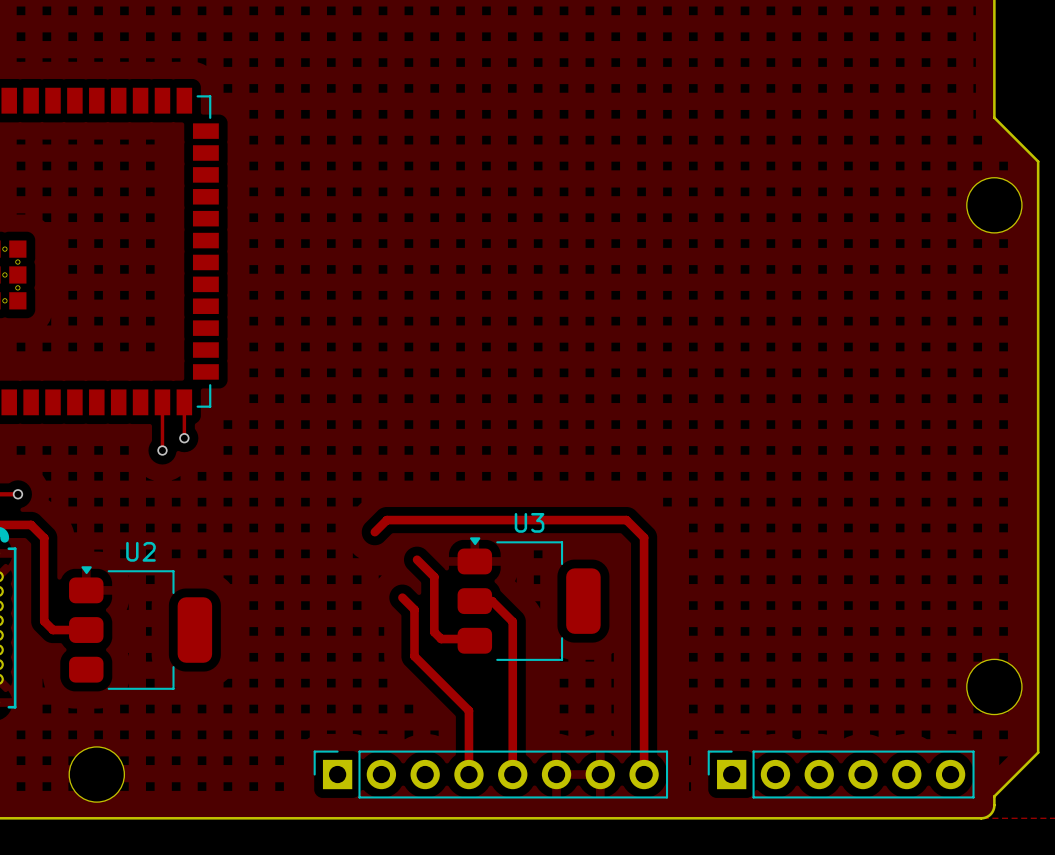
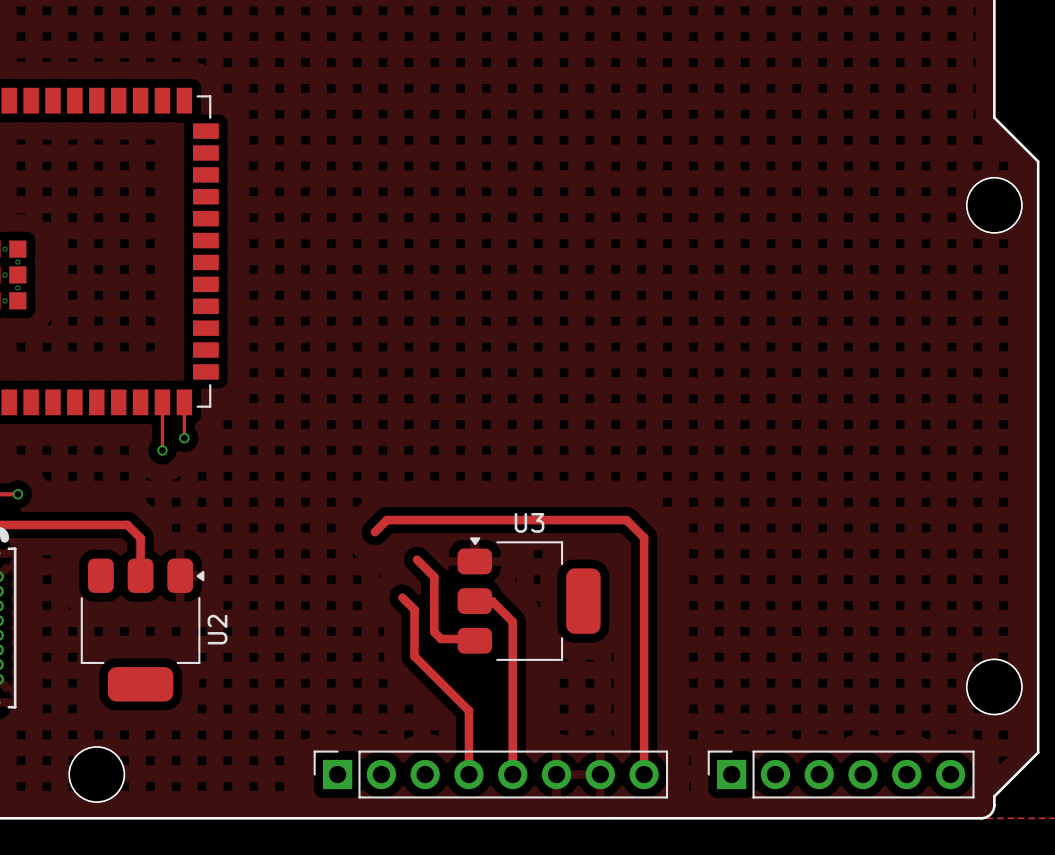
track: (31, 524) (44, 538) (44, 621) (53, 630) (86, 630) -> (31, 524) (127, 524) (140, 538) (140, 575)
U2 rotation: 0° (140, 628) -> 90° clockwise (142, 630)

